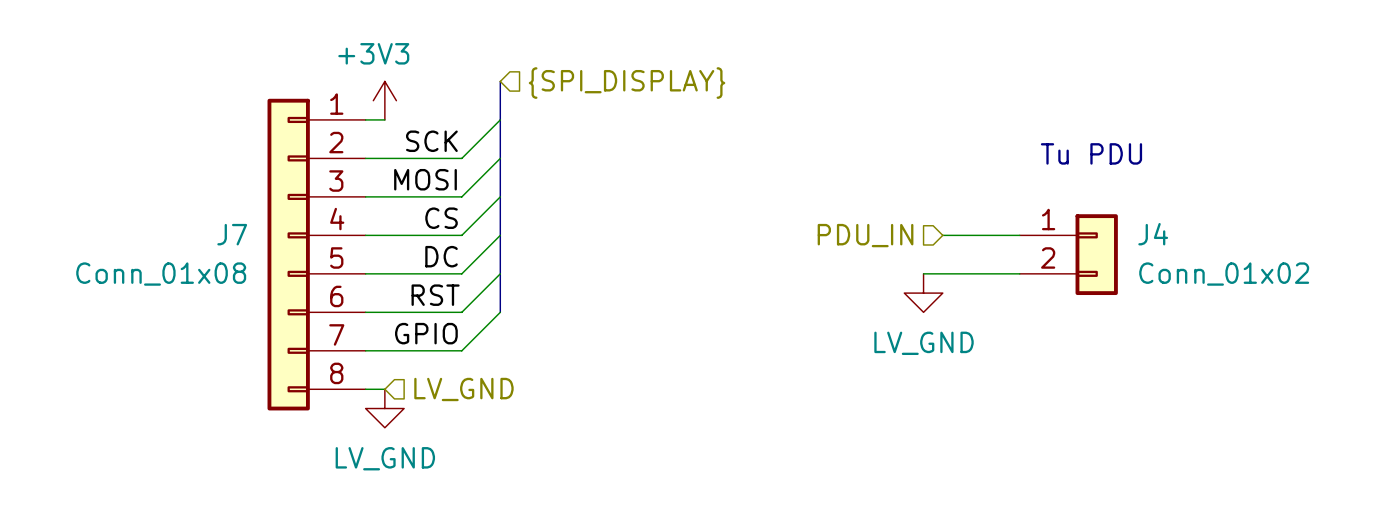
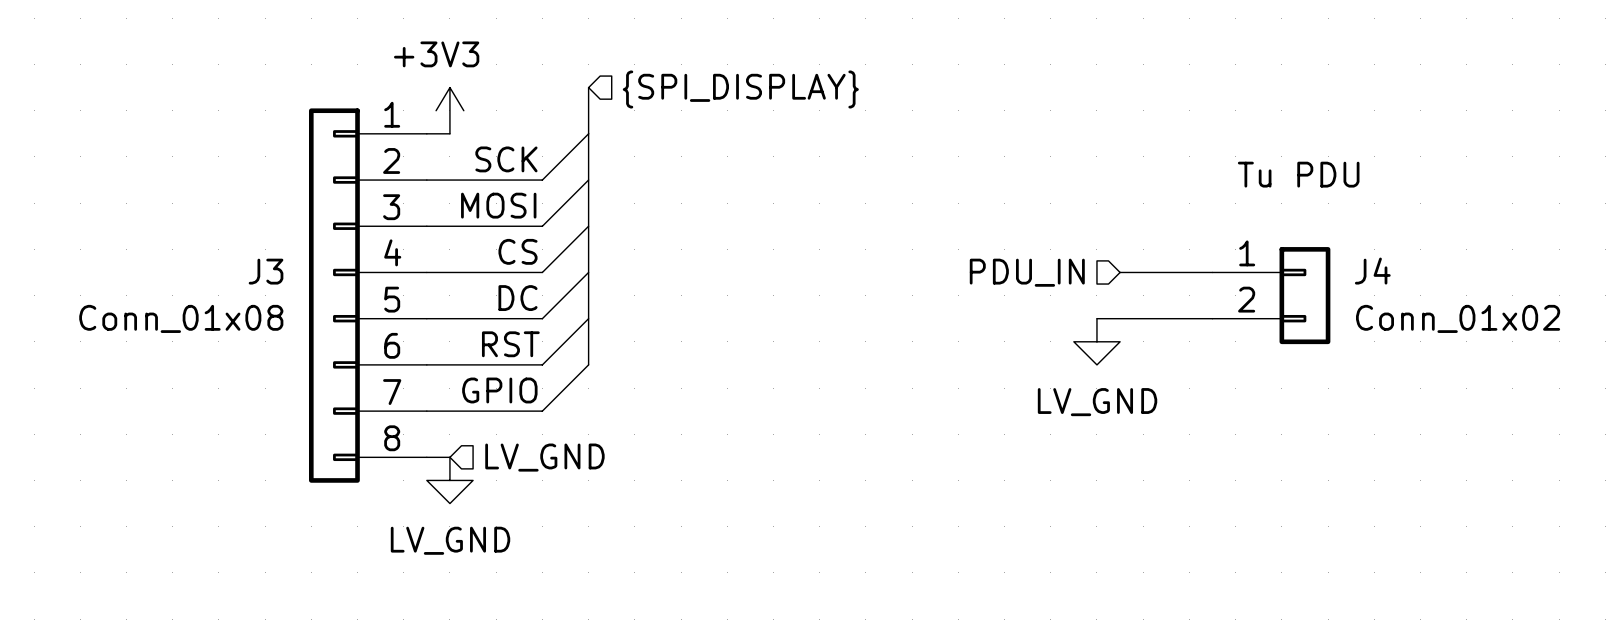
J7 name: J7 (232, 234) -> J3 (266, 271)

